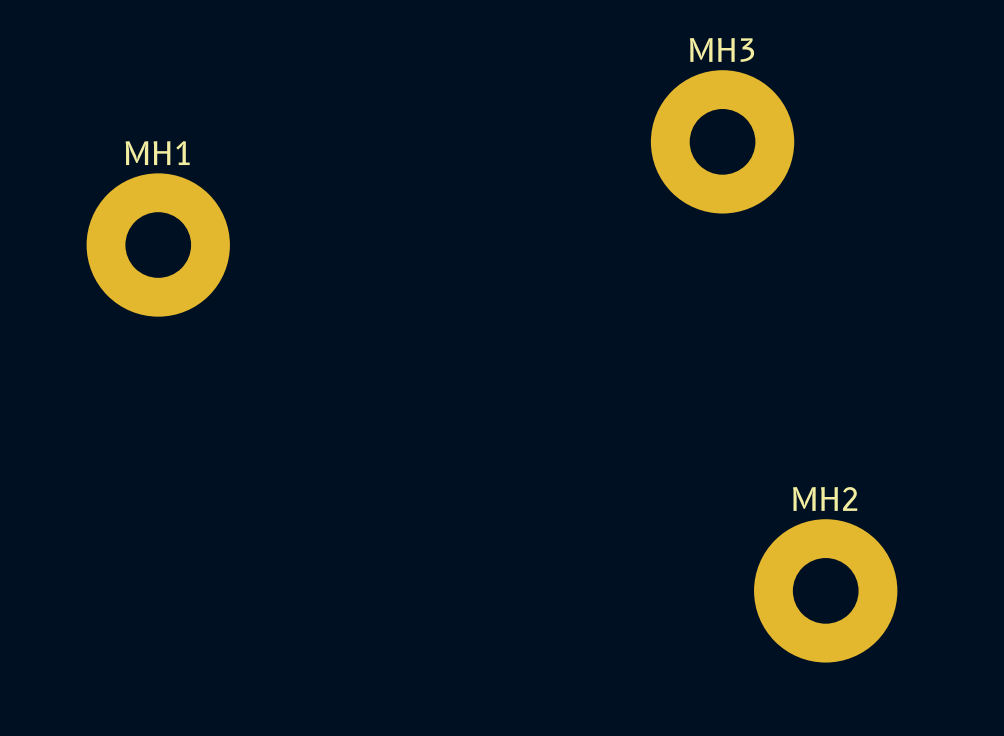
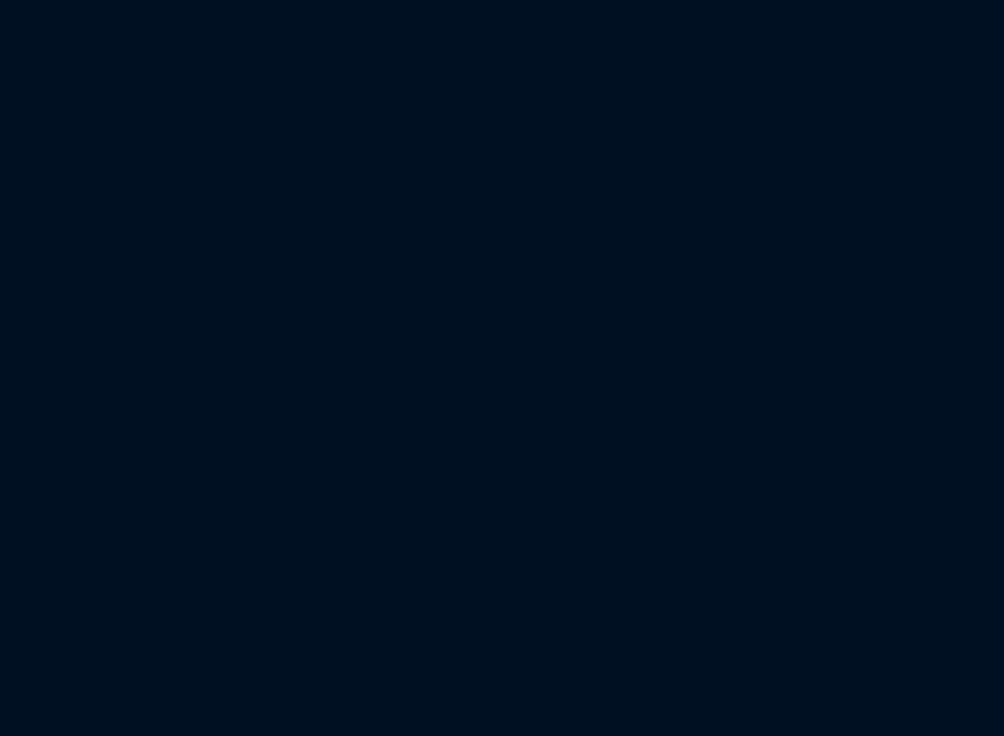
MH3: (722, 141) -> none
MH1: (158, 245) -> none
MH2: (825, 590) -> none

